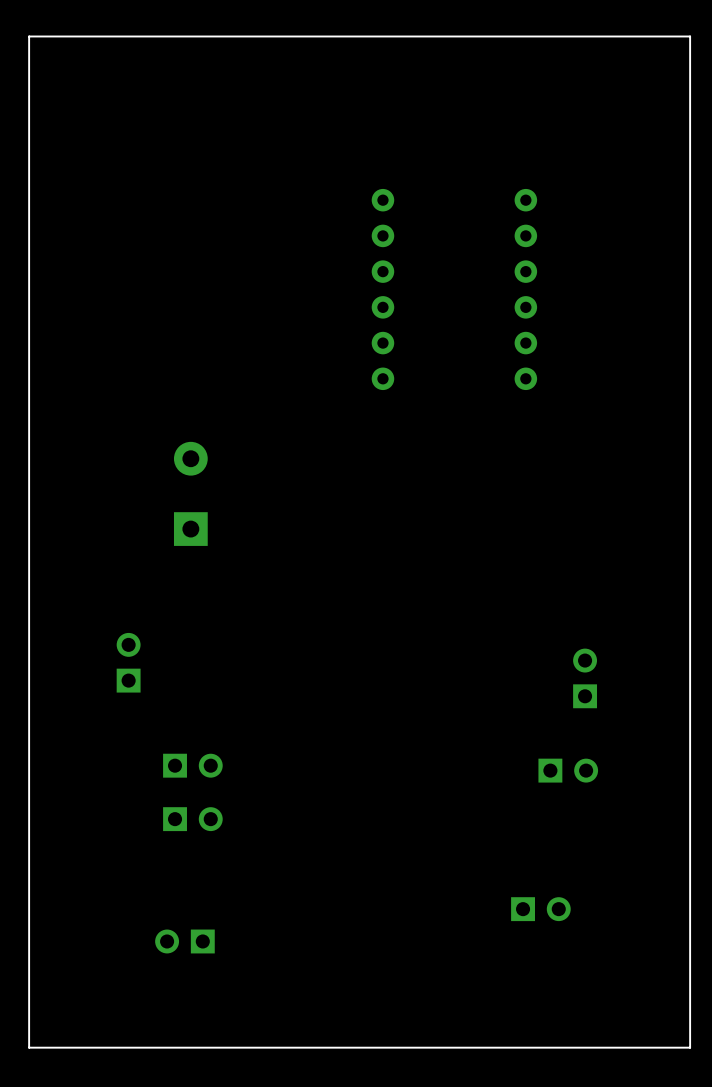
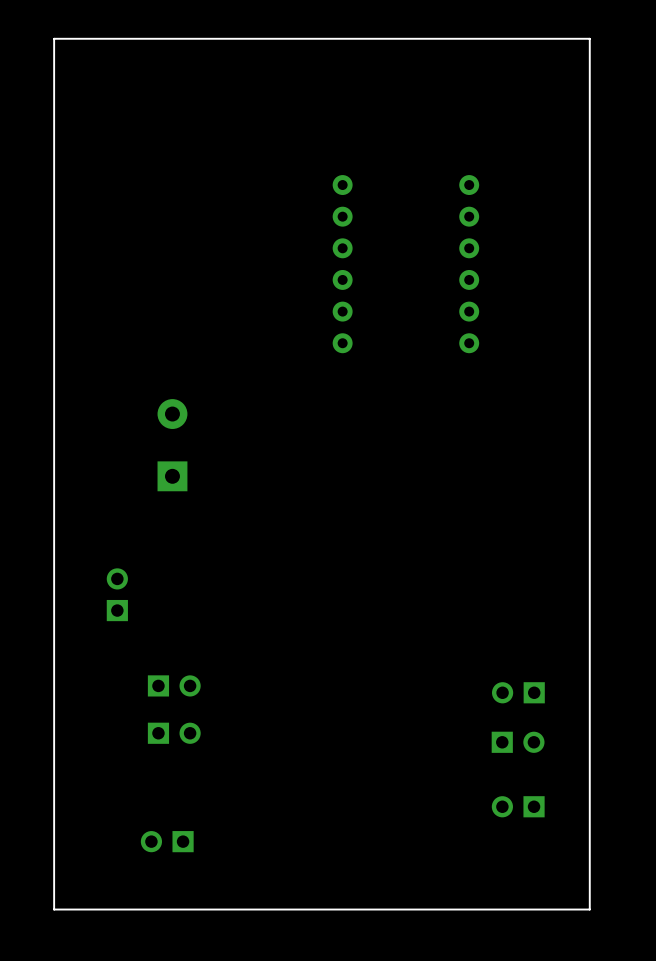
board edge: (690, 36) (29, 36) (29, 1047) (690, 1047) (690, 36) -> (589, 38) (589, 909) (54, 909) (54, 38) (589, 38)
part: (585, 678) -> none
part rotation: 0° (568, 770) -> 180° (518, 692)
part: none -> (518, 742)
part rotation: 0° (540, 909) -> 180° (518, 806)
part position: (540, 909) -> (518, 806)

